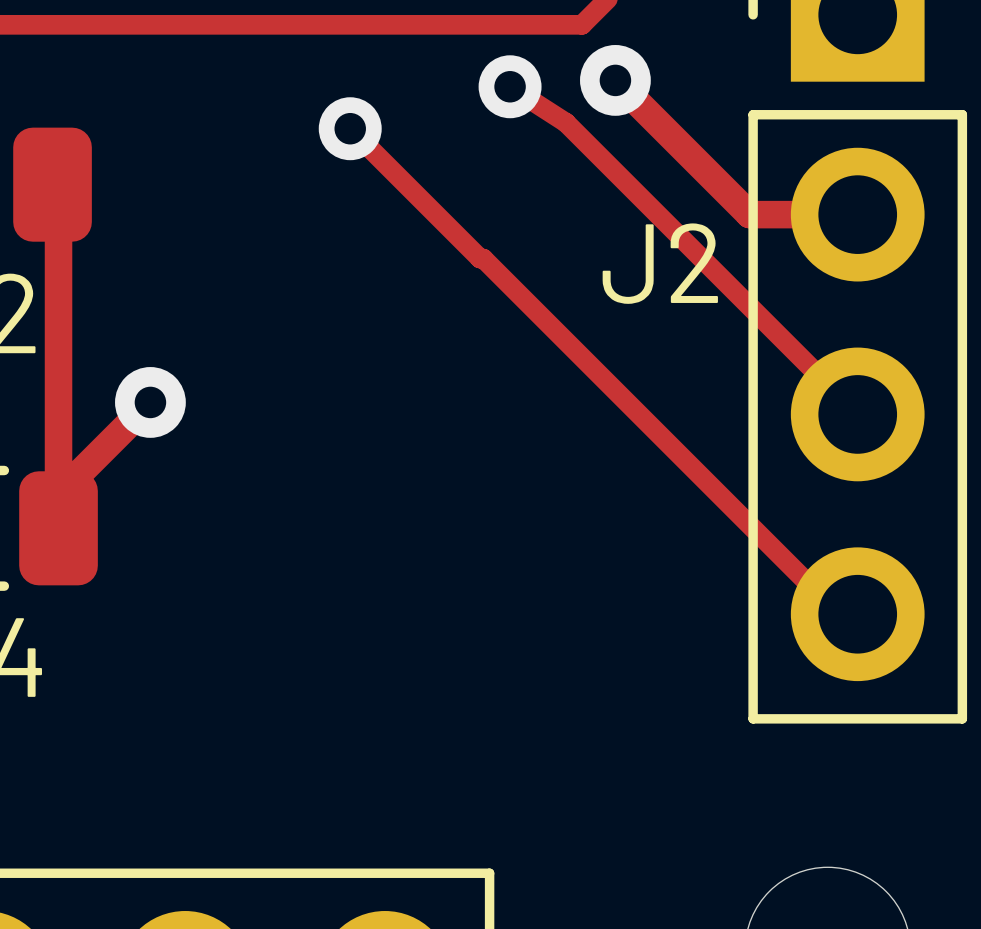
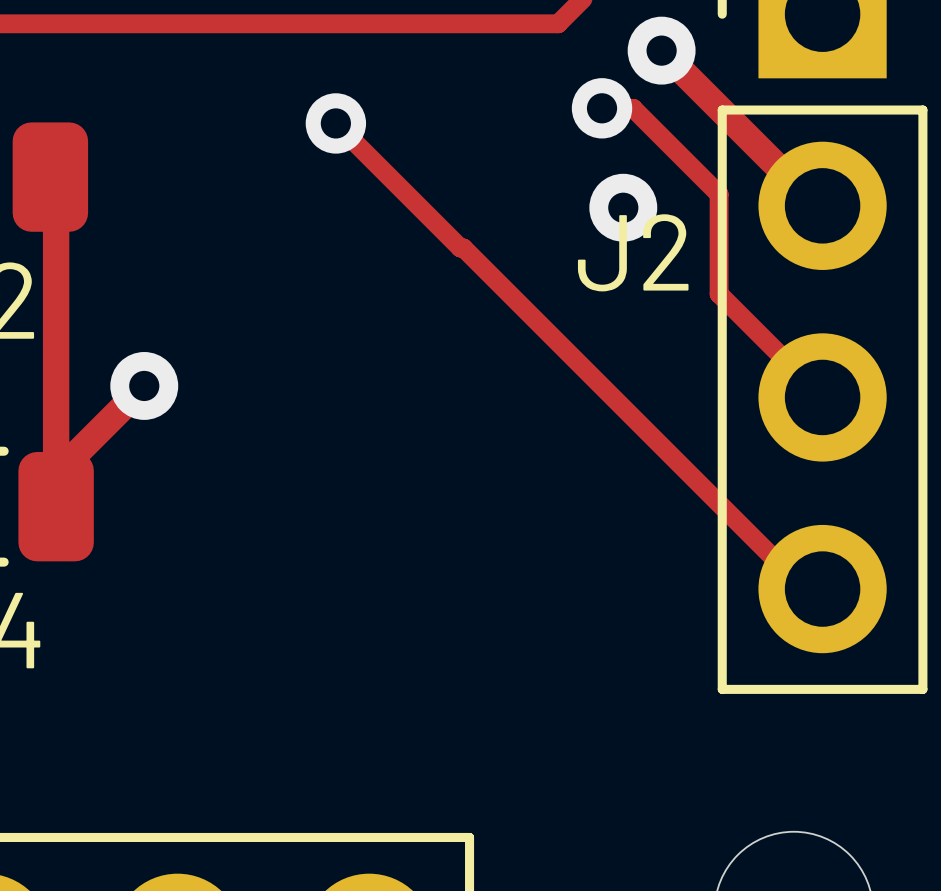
via: none -> (661, 50)
track: (615, 80) (749, 214) (851, 214) -> (661, 50) (816, 205)
via position: (615, 80) -> (602, 108)
track: (510, 86) (566, 122) (749, 306) -> (602, 108) (633, 108) (719, 194) (719, 293)
via: (510, 86) -> none
via: none -> (623, 207)

